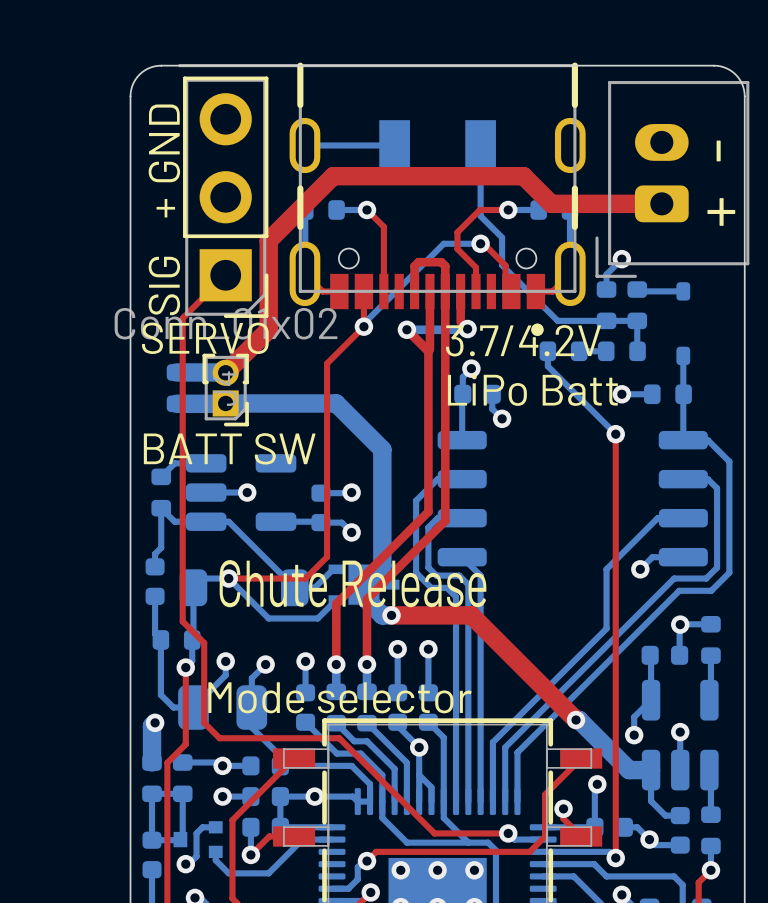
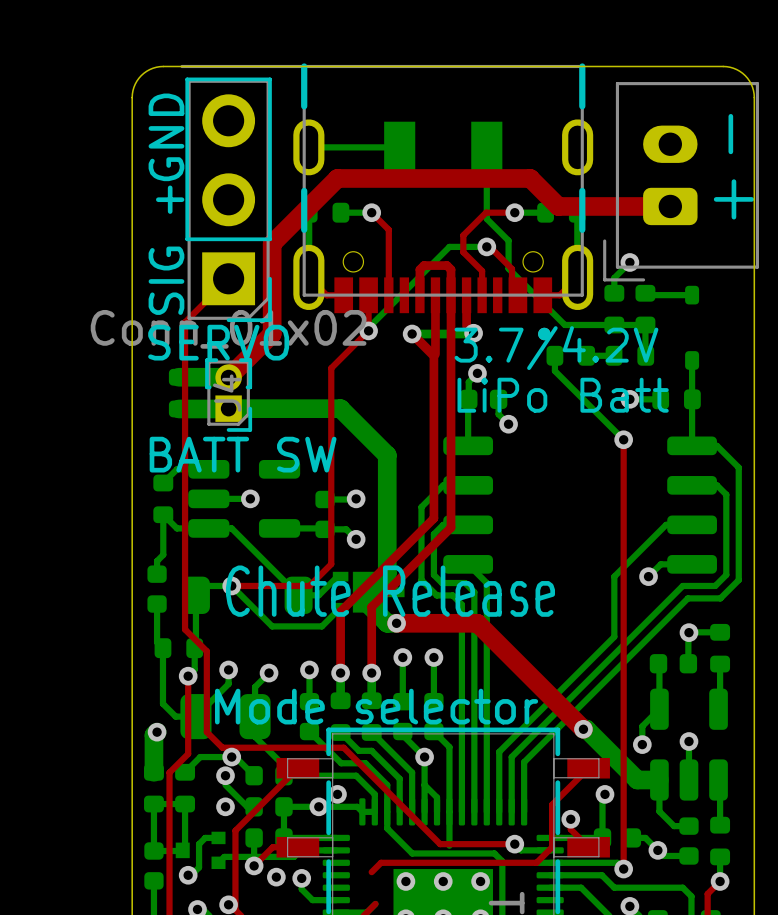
via: none -> (231, 757)
bottom track: (182, 762) (219, 762) (222, 765) (250, 765) -> (185, 772) (200, 757) (235, 757) (254, 775)
via: none -> (337, 794)
bottom track: (222, 796) (244, 796) -> (225, 785) (247, 806)
bottom track: (443, 817) (468, 842) -> (449, 828) (449, 845)
bottom track: (302, 839) (268, 873) (228, 873) (215, 860) (215, 851) -> (306, 850) (300, 850) (294, 856) (224, 856) (218, 862)
bottom track: (366, 861) (363, 861) (357, 867) (357, 879) (348, 888) (332, 888) -> (301, 878) (301, 889) (312, 900) (336, 900)
via: (366, 861) -> none
via: none -> (276, 877)
via: none -> (301, 878)
via: (370, 892) -> none
via: none -> (228, 904)

